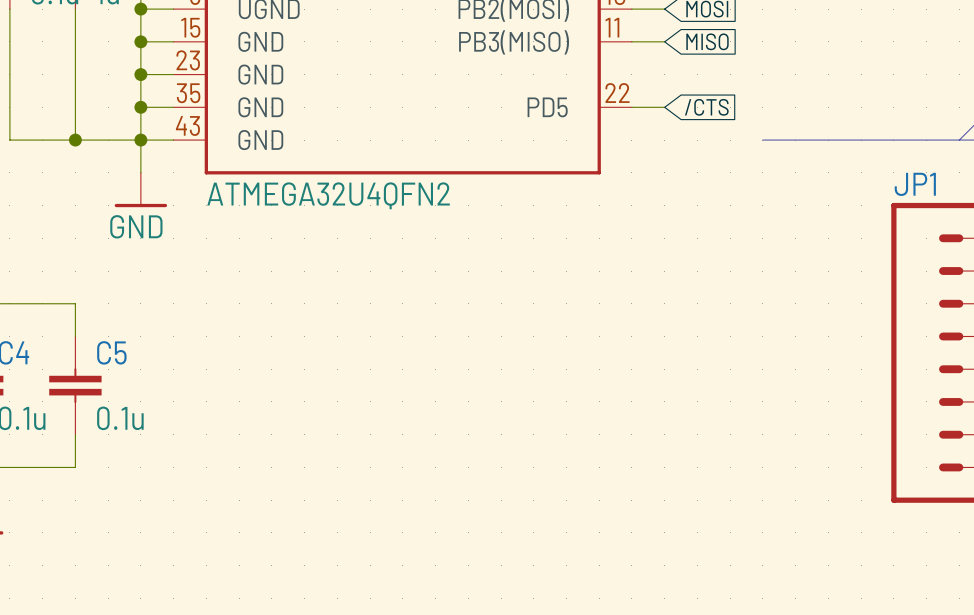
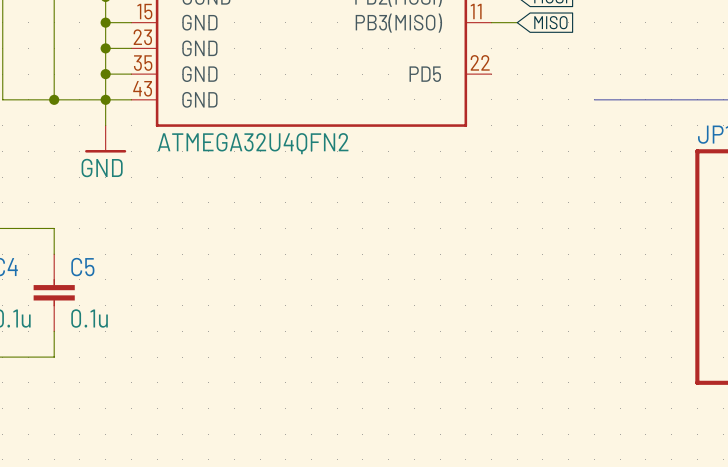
wire: (631, 107) (664, 107) -> none
global label: /CTS (706, 107) -> none

